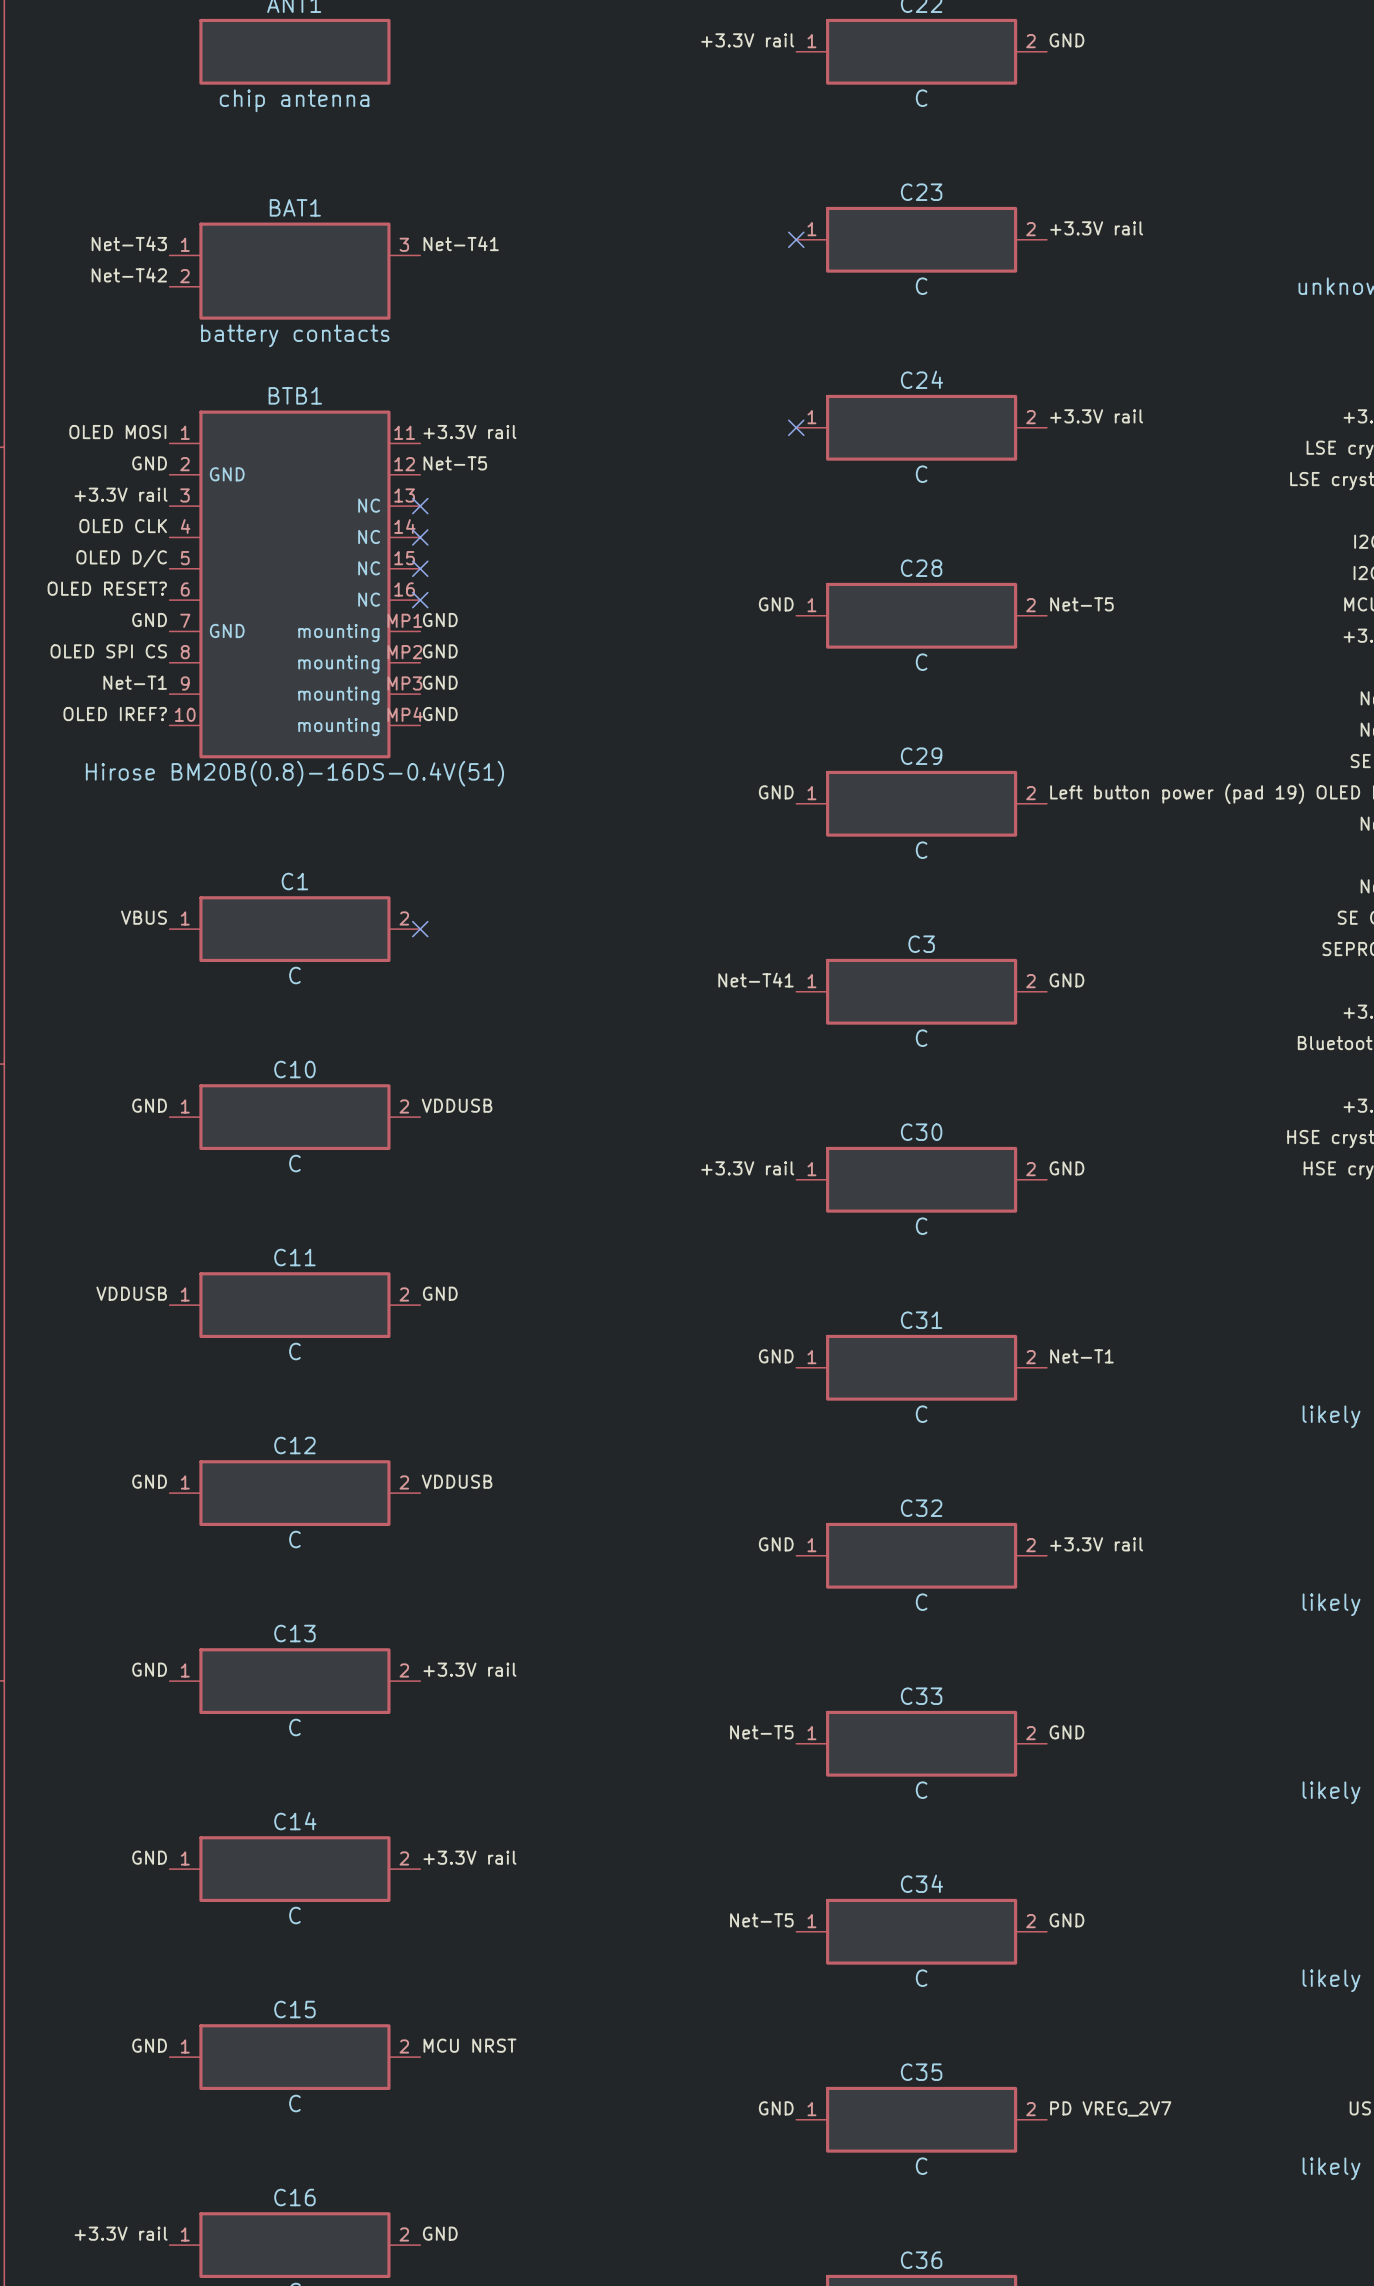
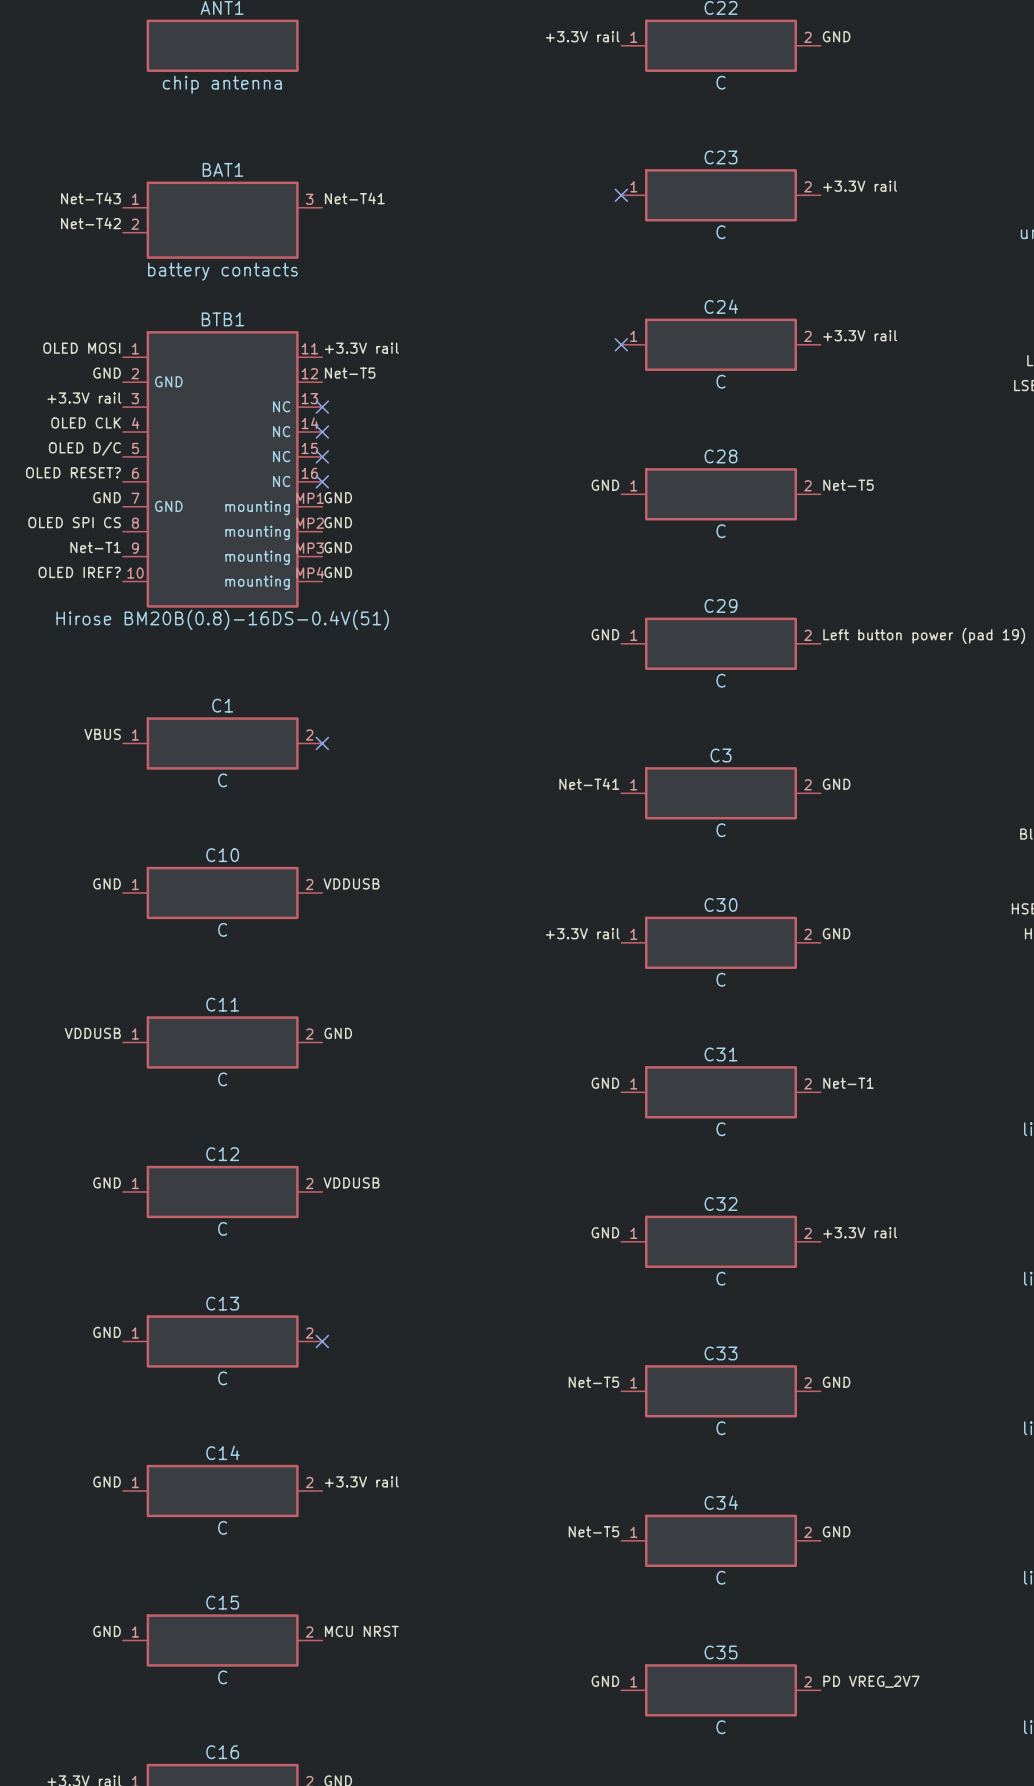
label: +3.3V rail (469, 1669) -> none
no-connect mark: none -> (322, 1341)

